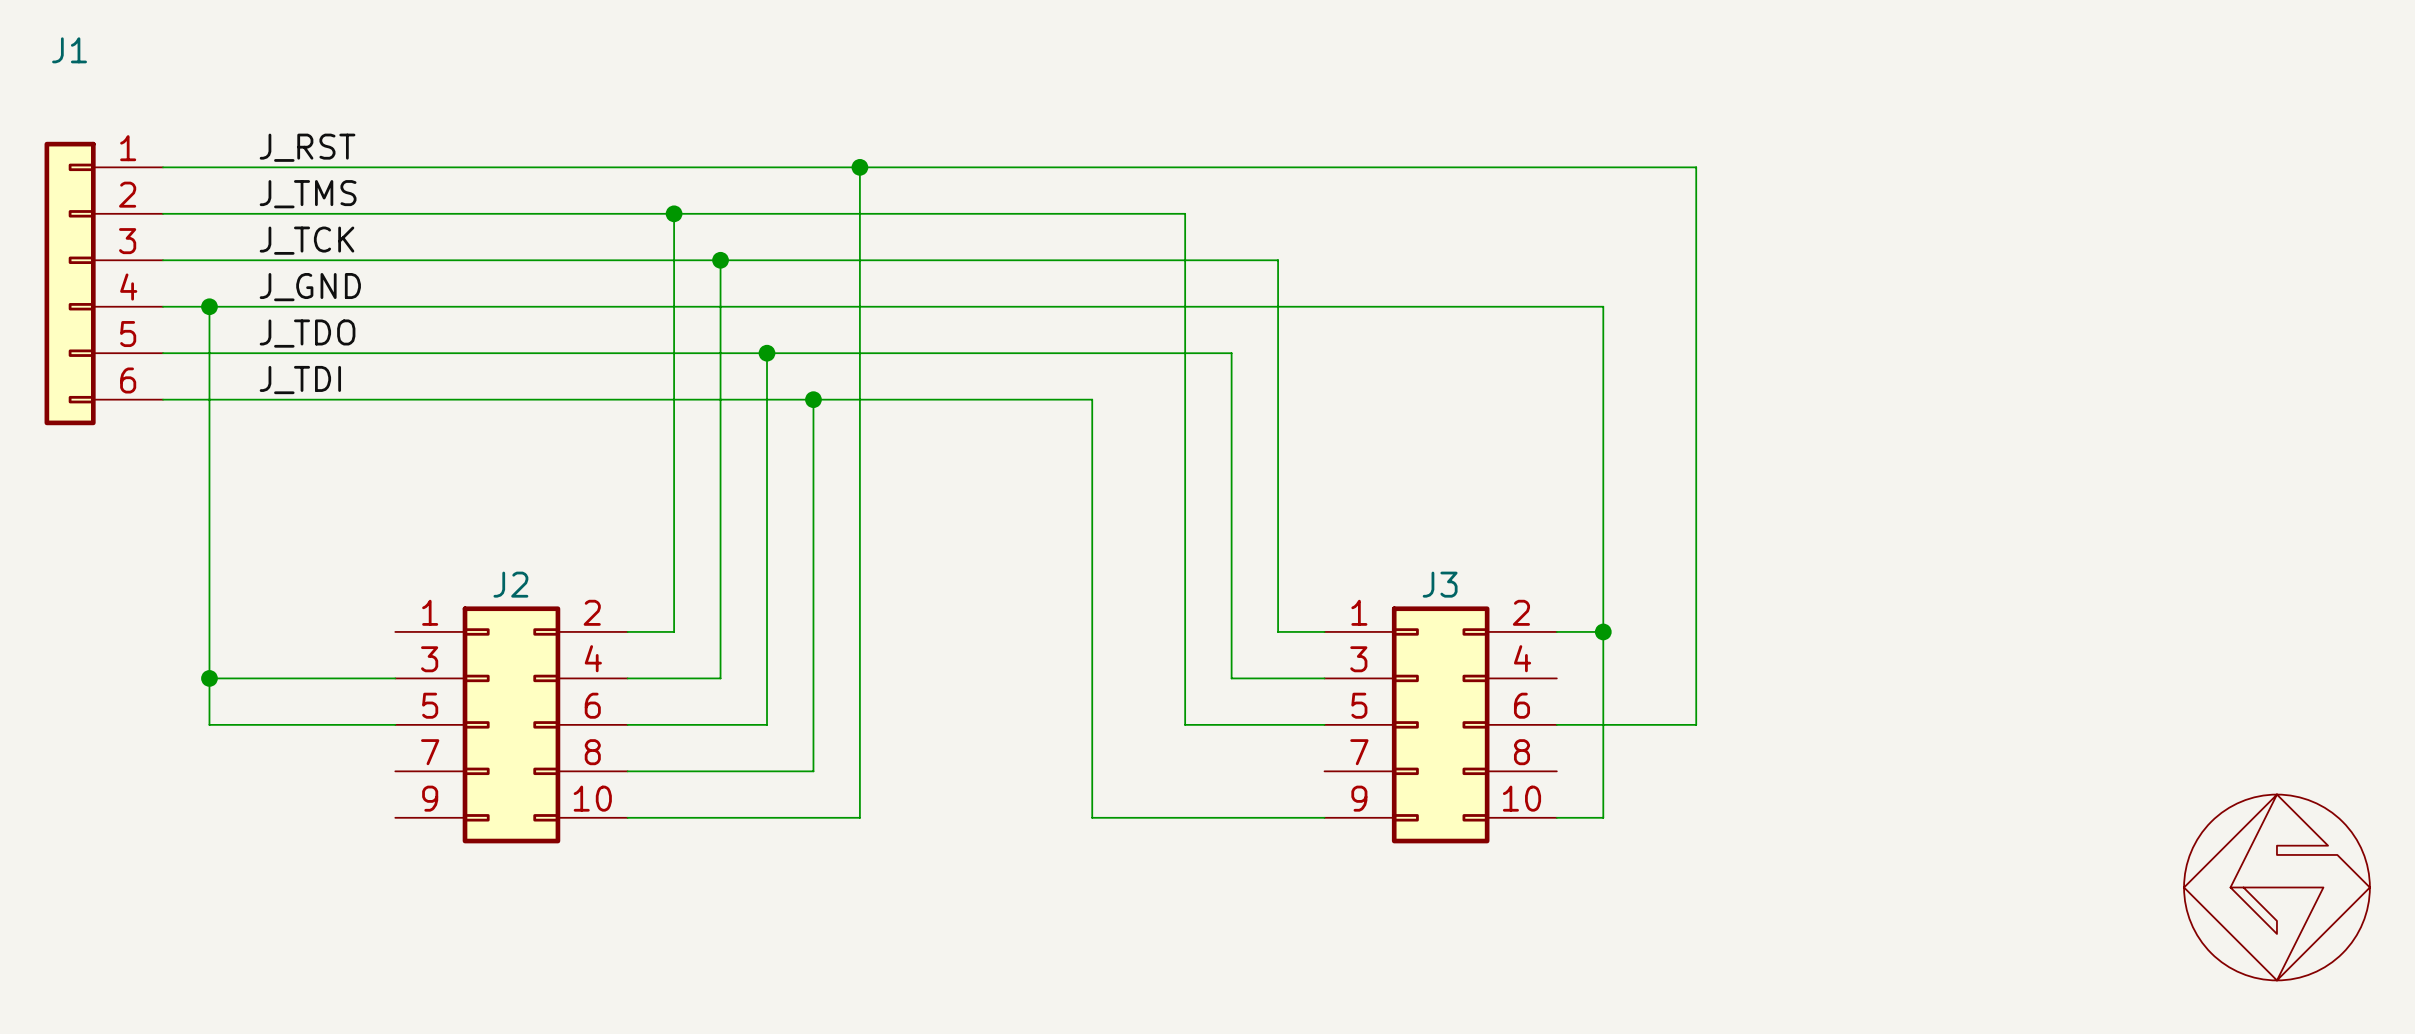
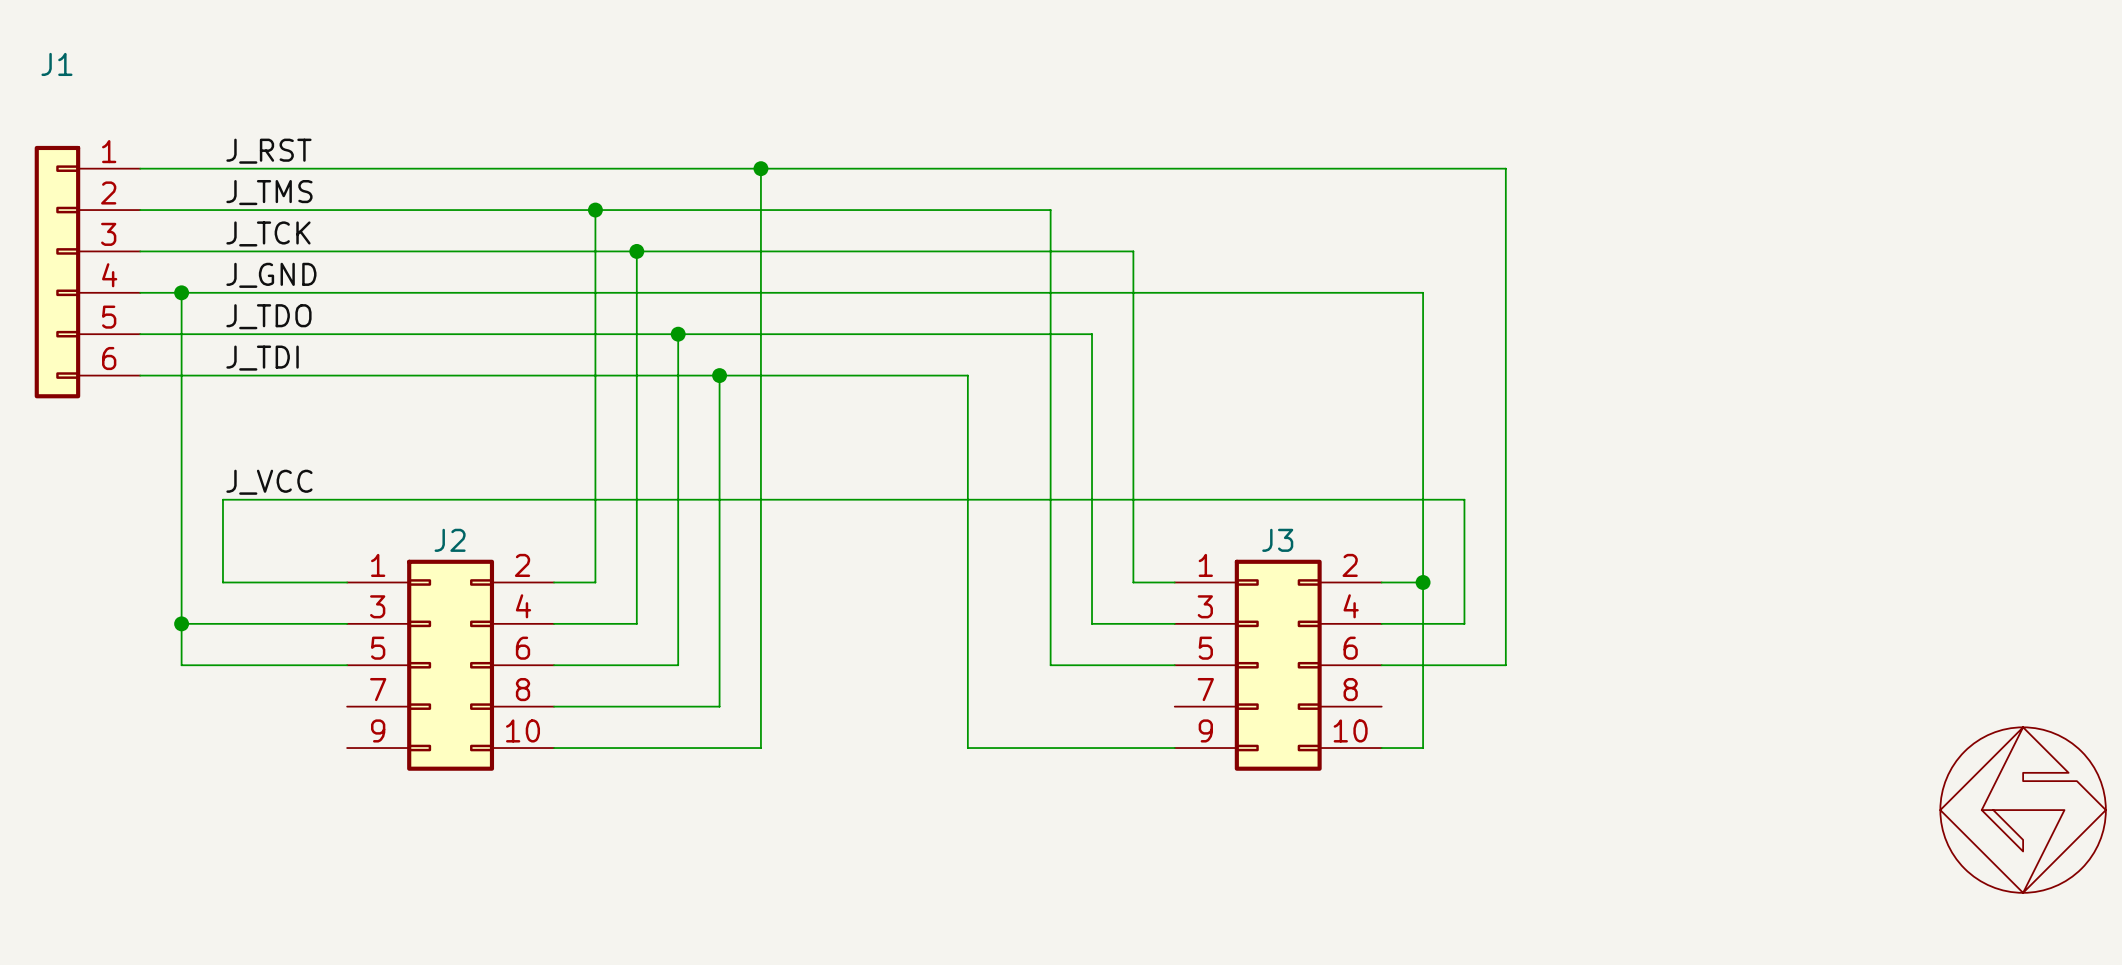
label: none -> J_VCC (269, 482)
wire: none -> (347, 582) (222, 582) (222, 499) (1464, 499) (1464, 623) (1381, 623)

